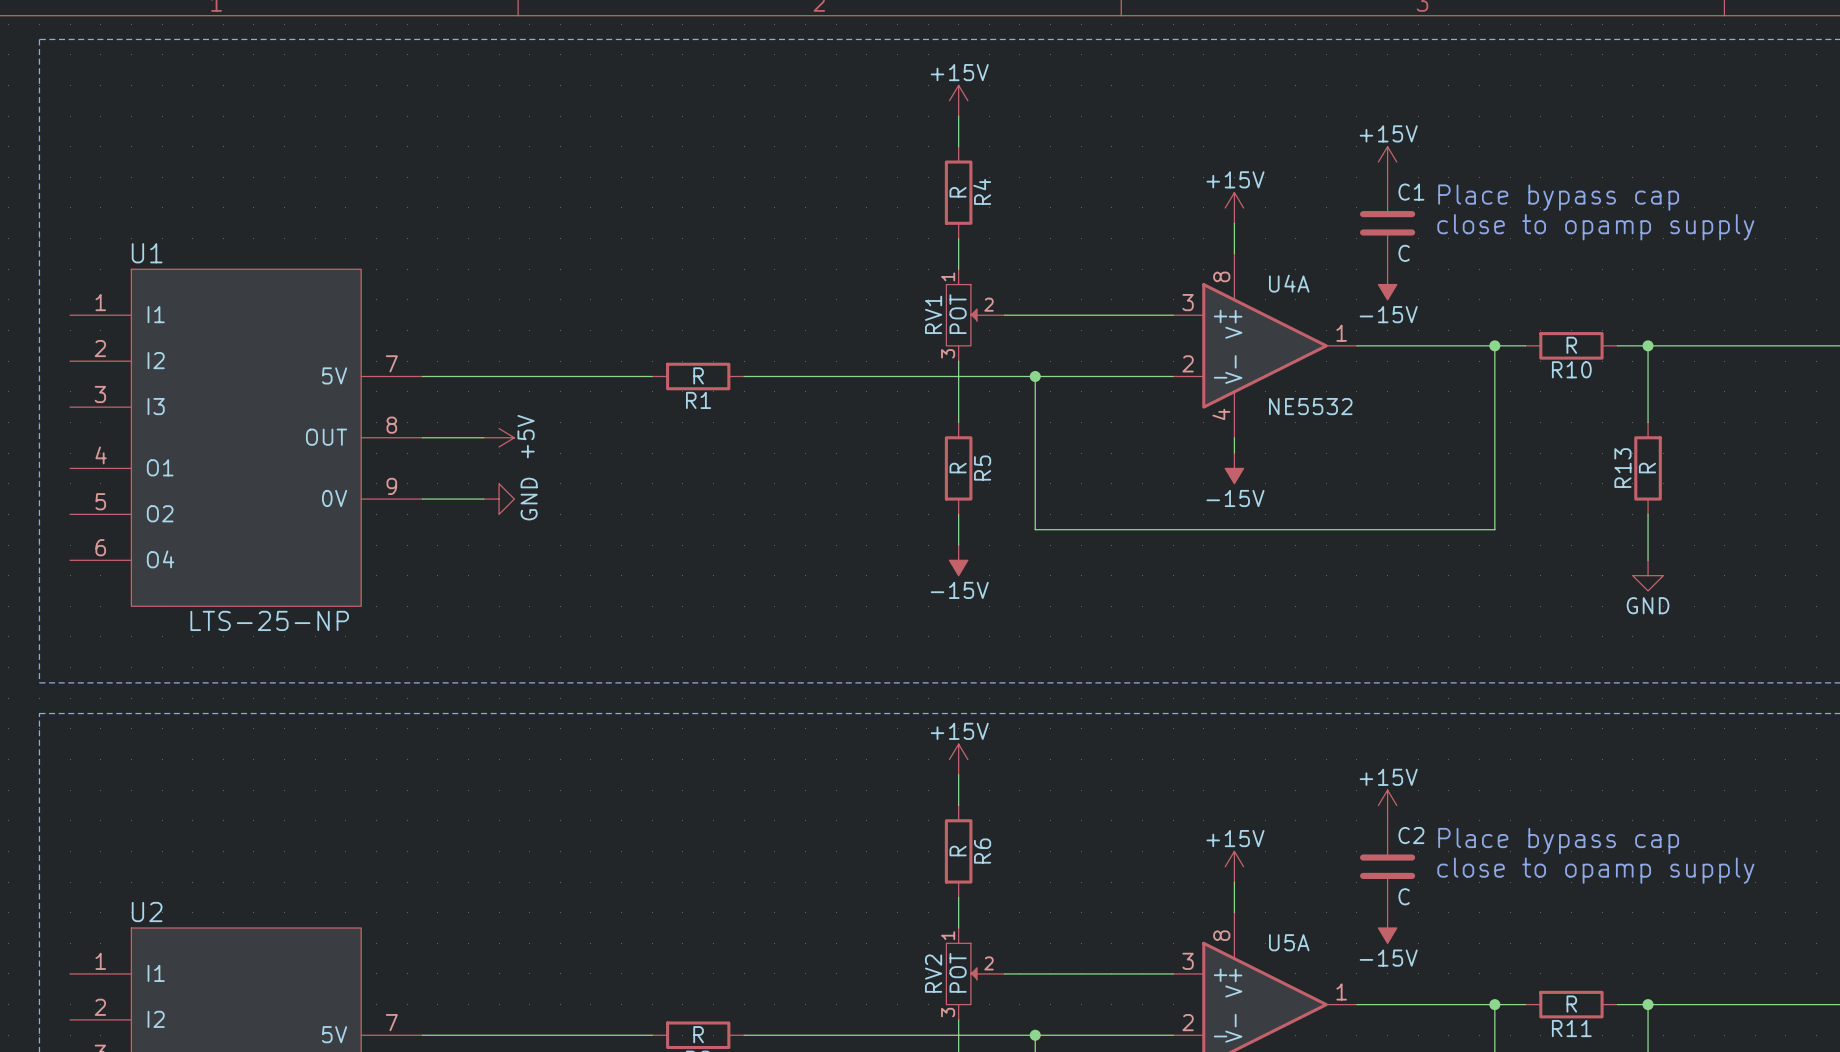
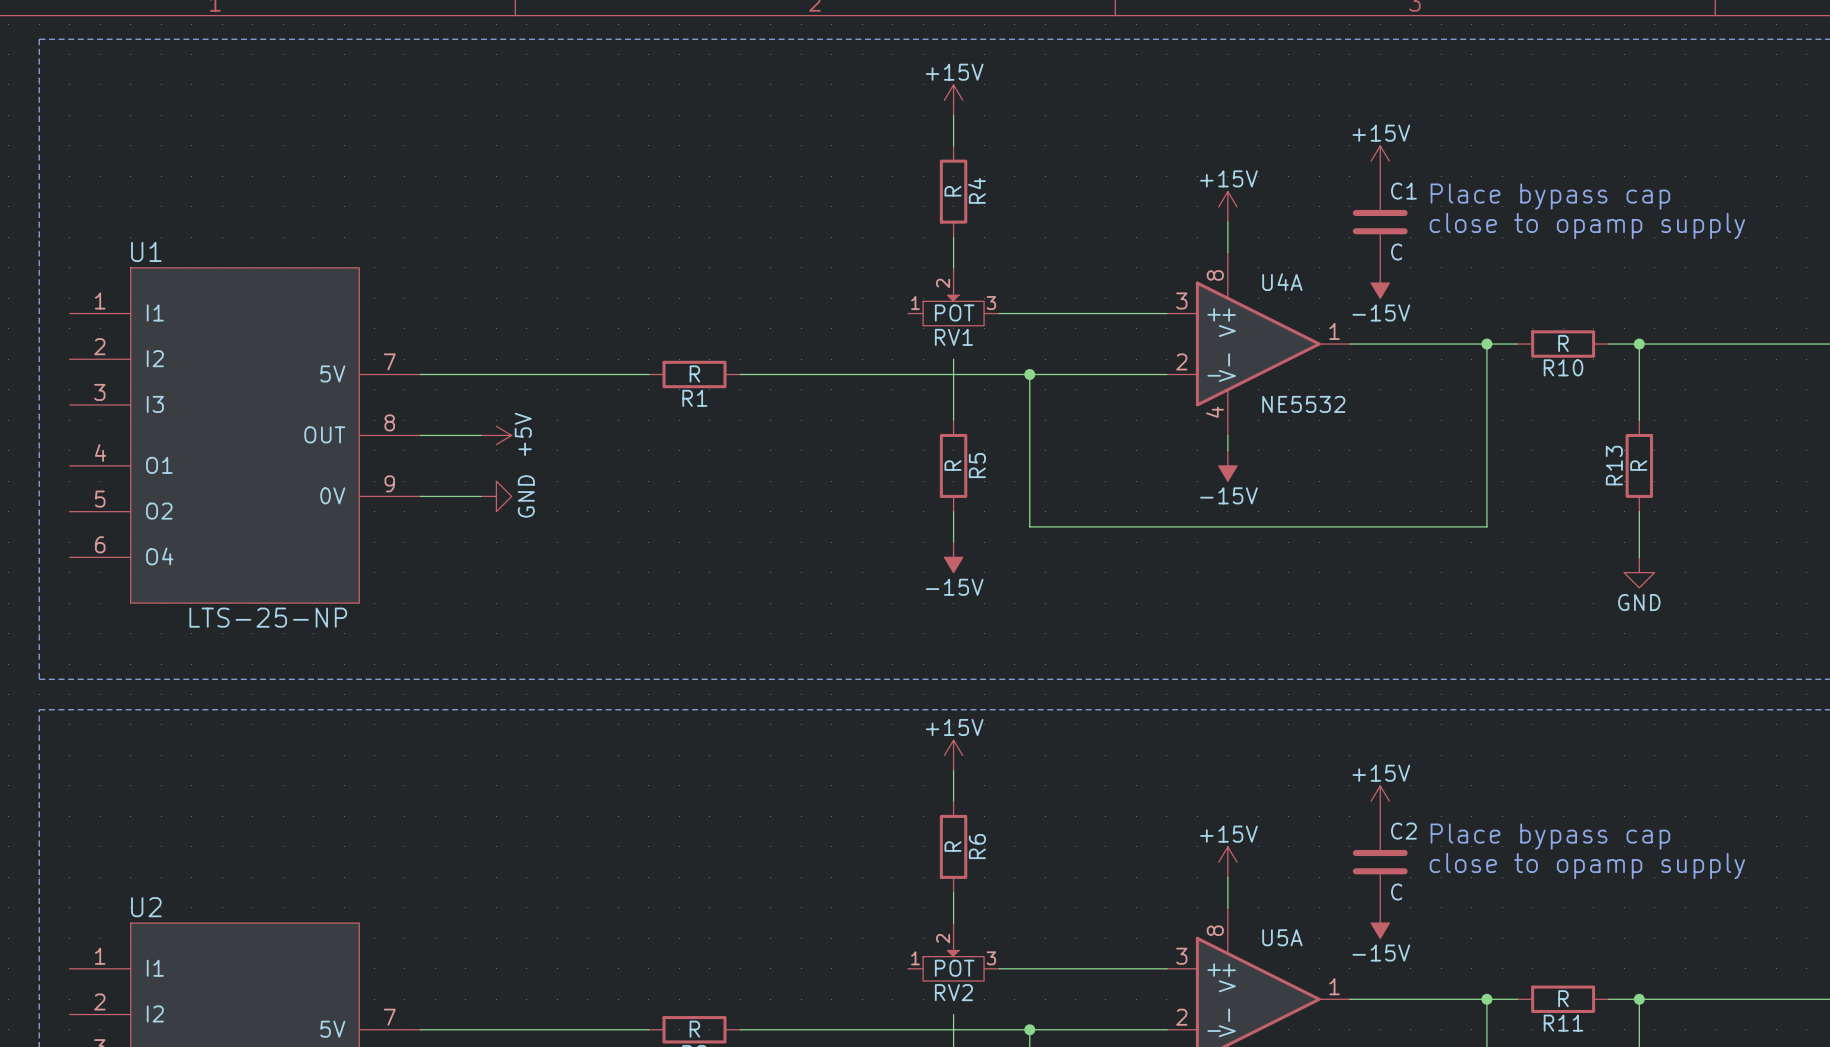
RV1 rotation: 0° (961, 315) -> 90° counterclockwise (953, 310)
RV2 rotation: 0° (961, 973) -> 90° counterclockwise (953, 965)

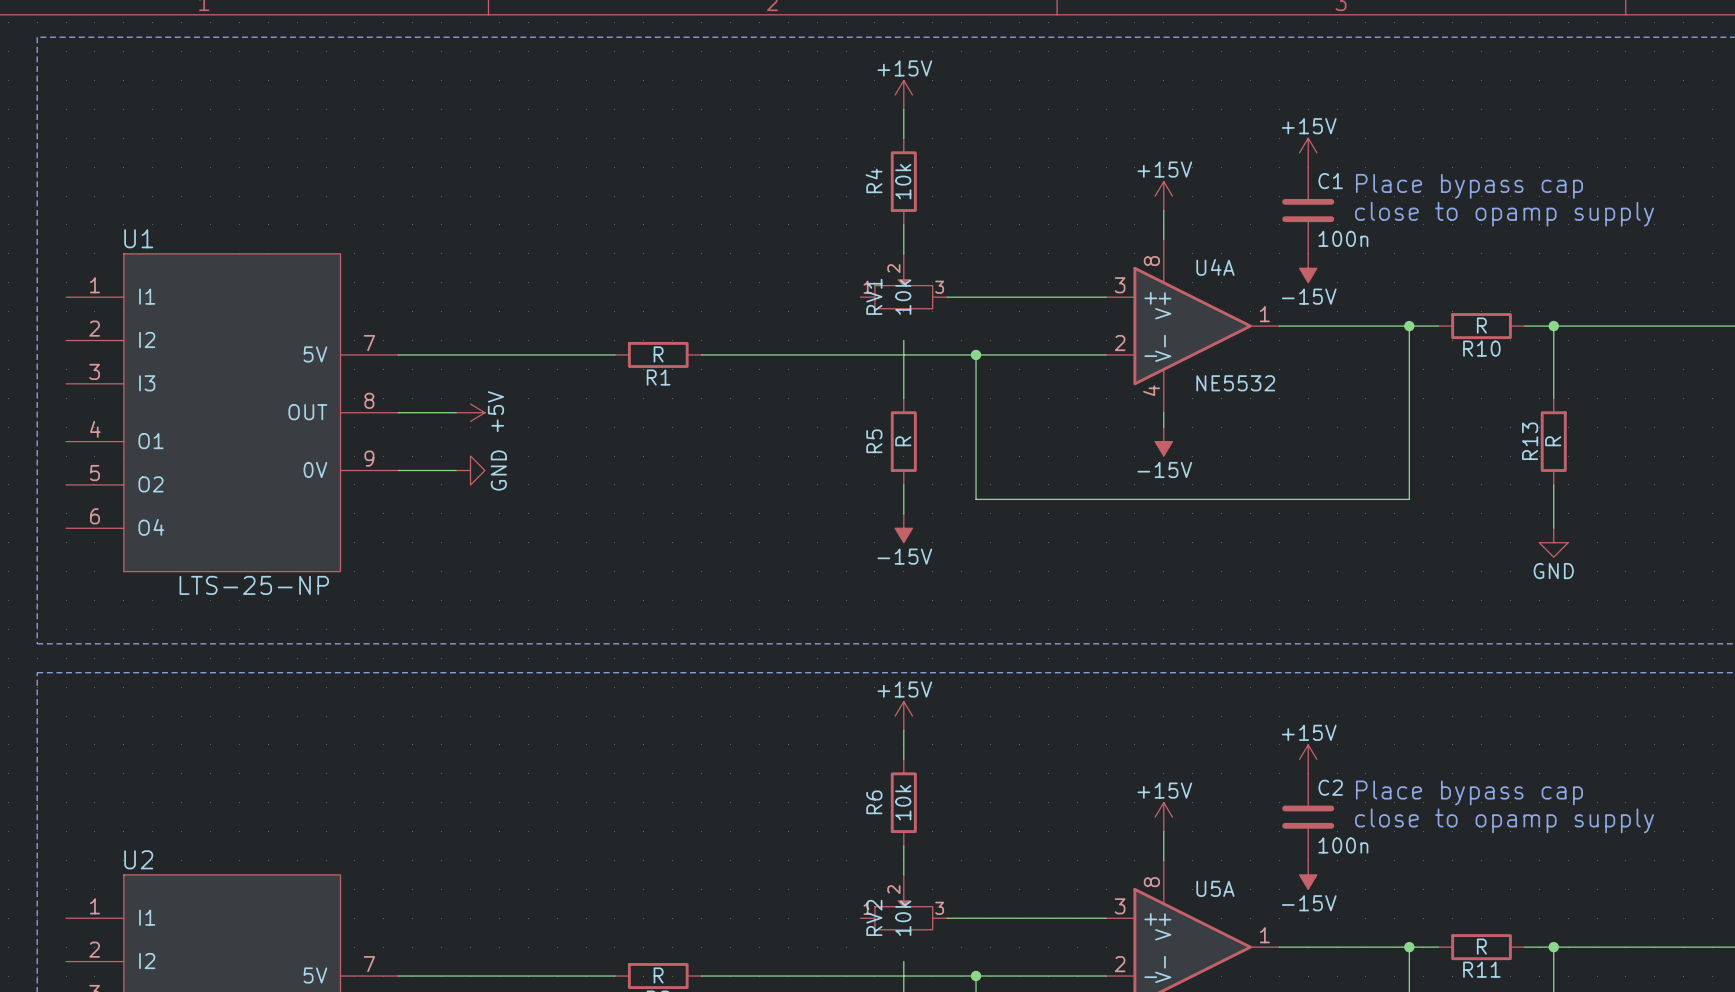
R4 name position: R4 (977, 190) -> R4 (874, 180)
R4 value: R (953, 191) -> 10k (903, 181)
C1 value: C (1396, 252) -> 100n (1343, 238)
RV1 value: POT (954, 312) -> 10k (903, 297)
RV1 name rotation: 0° (953, 337) -> 90° counterclockwise (874, 296)
R5 name position: R5 (977, 465) -> R5 (874, 441)
R6 value: R (953, 846) -> 10k (903, 802)
R6 name position: R6 (977, 846) -> R6 (874, 802)
C2 value: C (1396, 892) -> 100n (1343, 845)
RV2 value: POT (954, 968) -> 10k (903, 918)
RV2 name rotation: 0° (953, 992) -> 90° counterclockwise (874, 917)

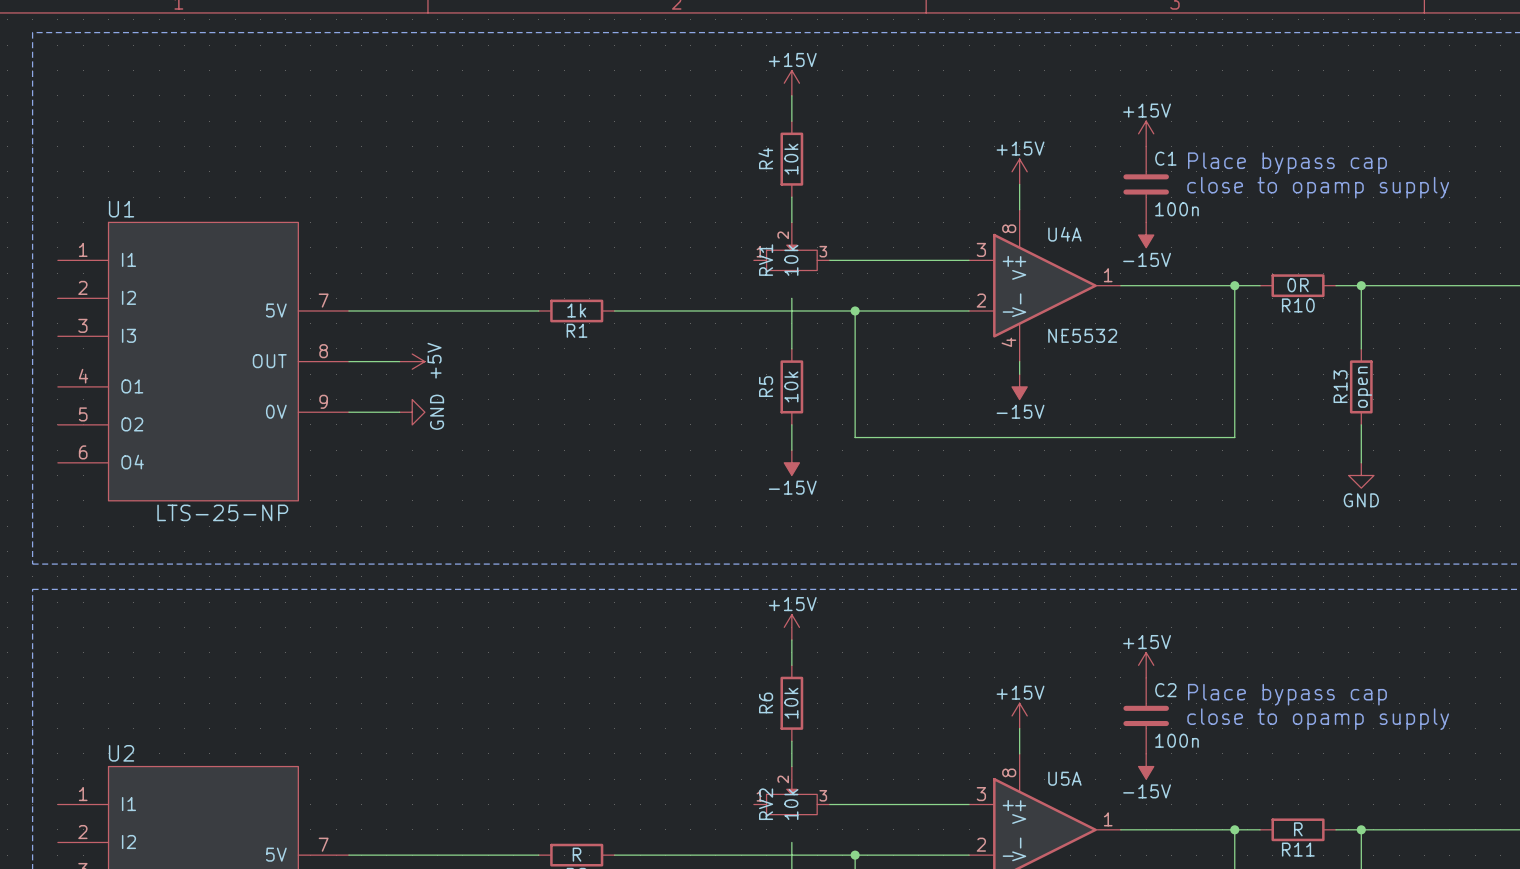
R10 value: R (1481, 325) -> 0R (1298, 285)
R1 value: R (658, 354) -> 1k (576, 310)
R5 value: R (903, 441) -> 10k (791, 386)
R13 value: R (1553, 441) -> open (1365, 387)

